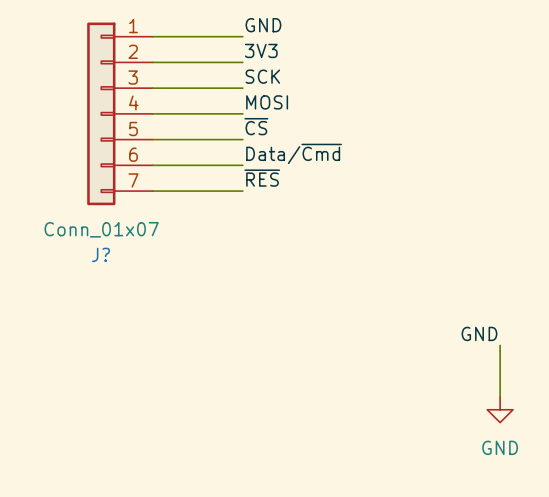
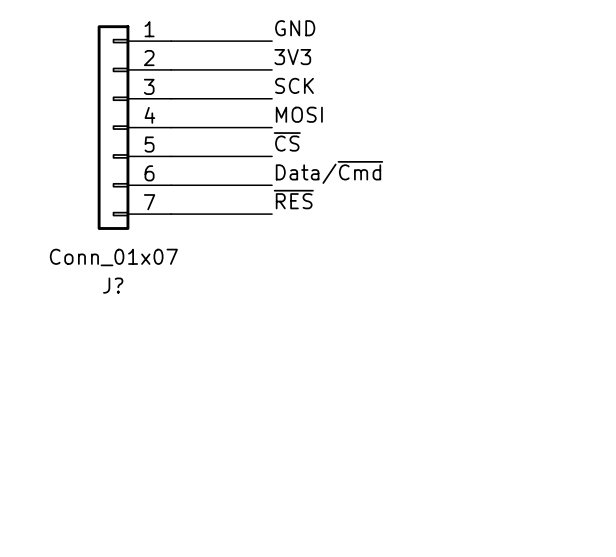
label: GND (479, 333) -> none
wire: (500, 345) (500, 396) -> none
power symbol: GND (500, 409) -> none

